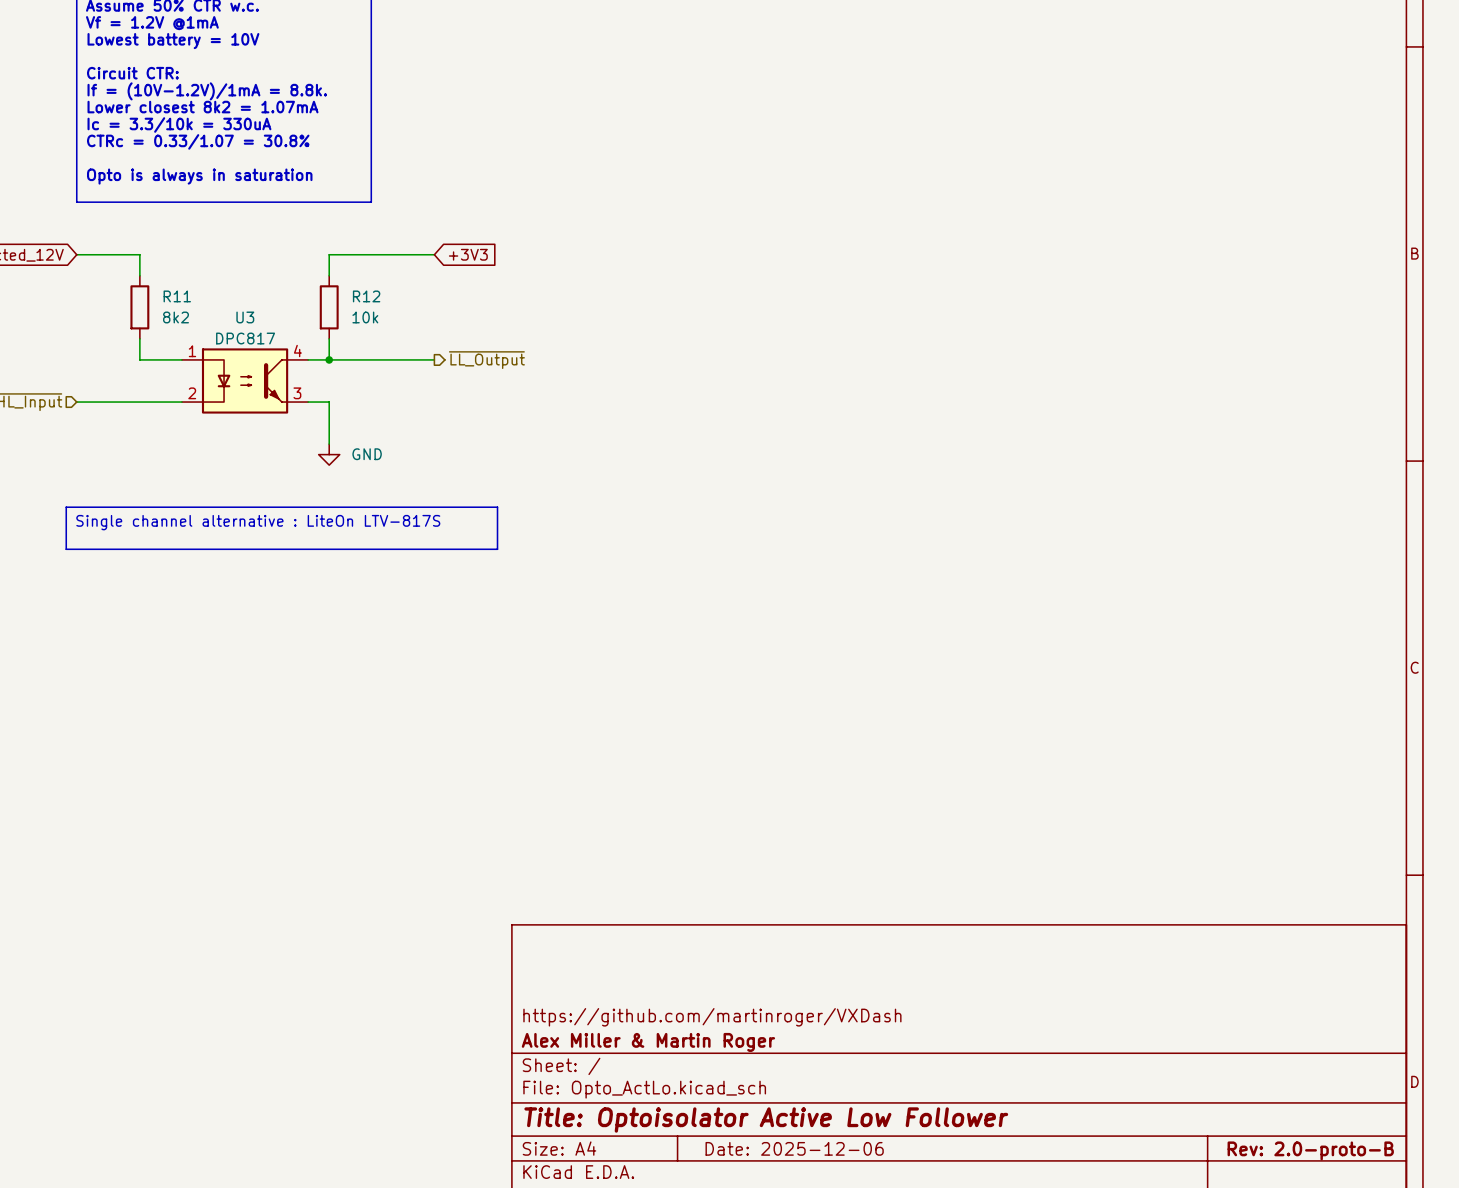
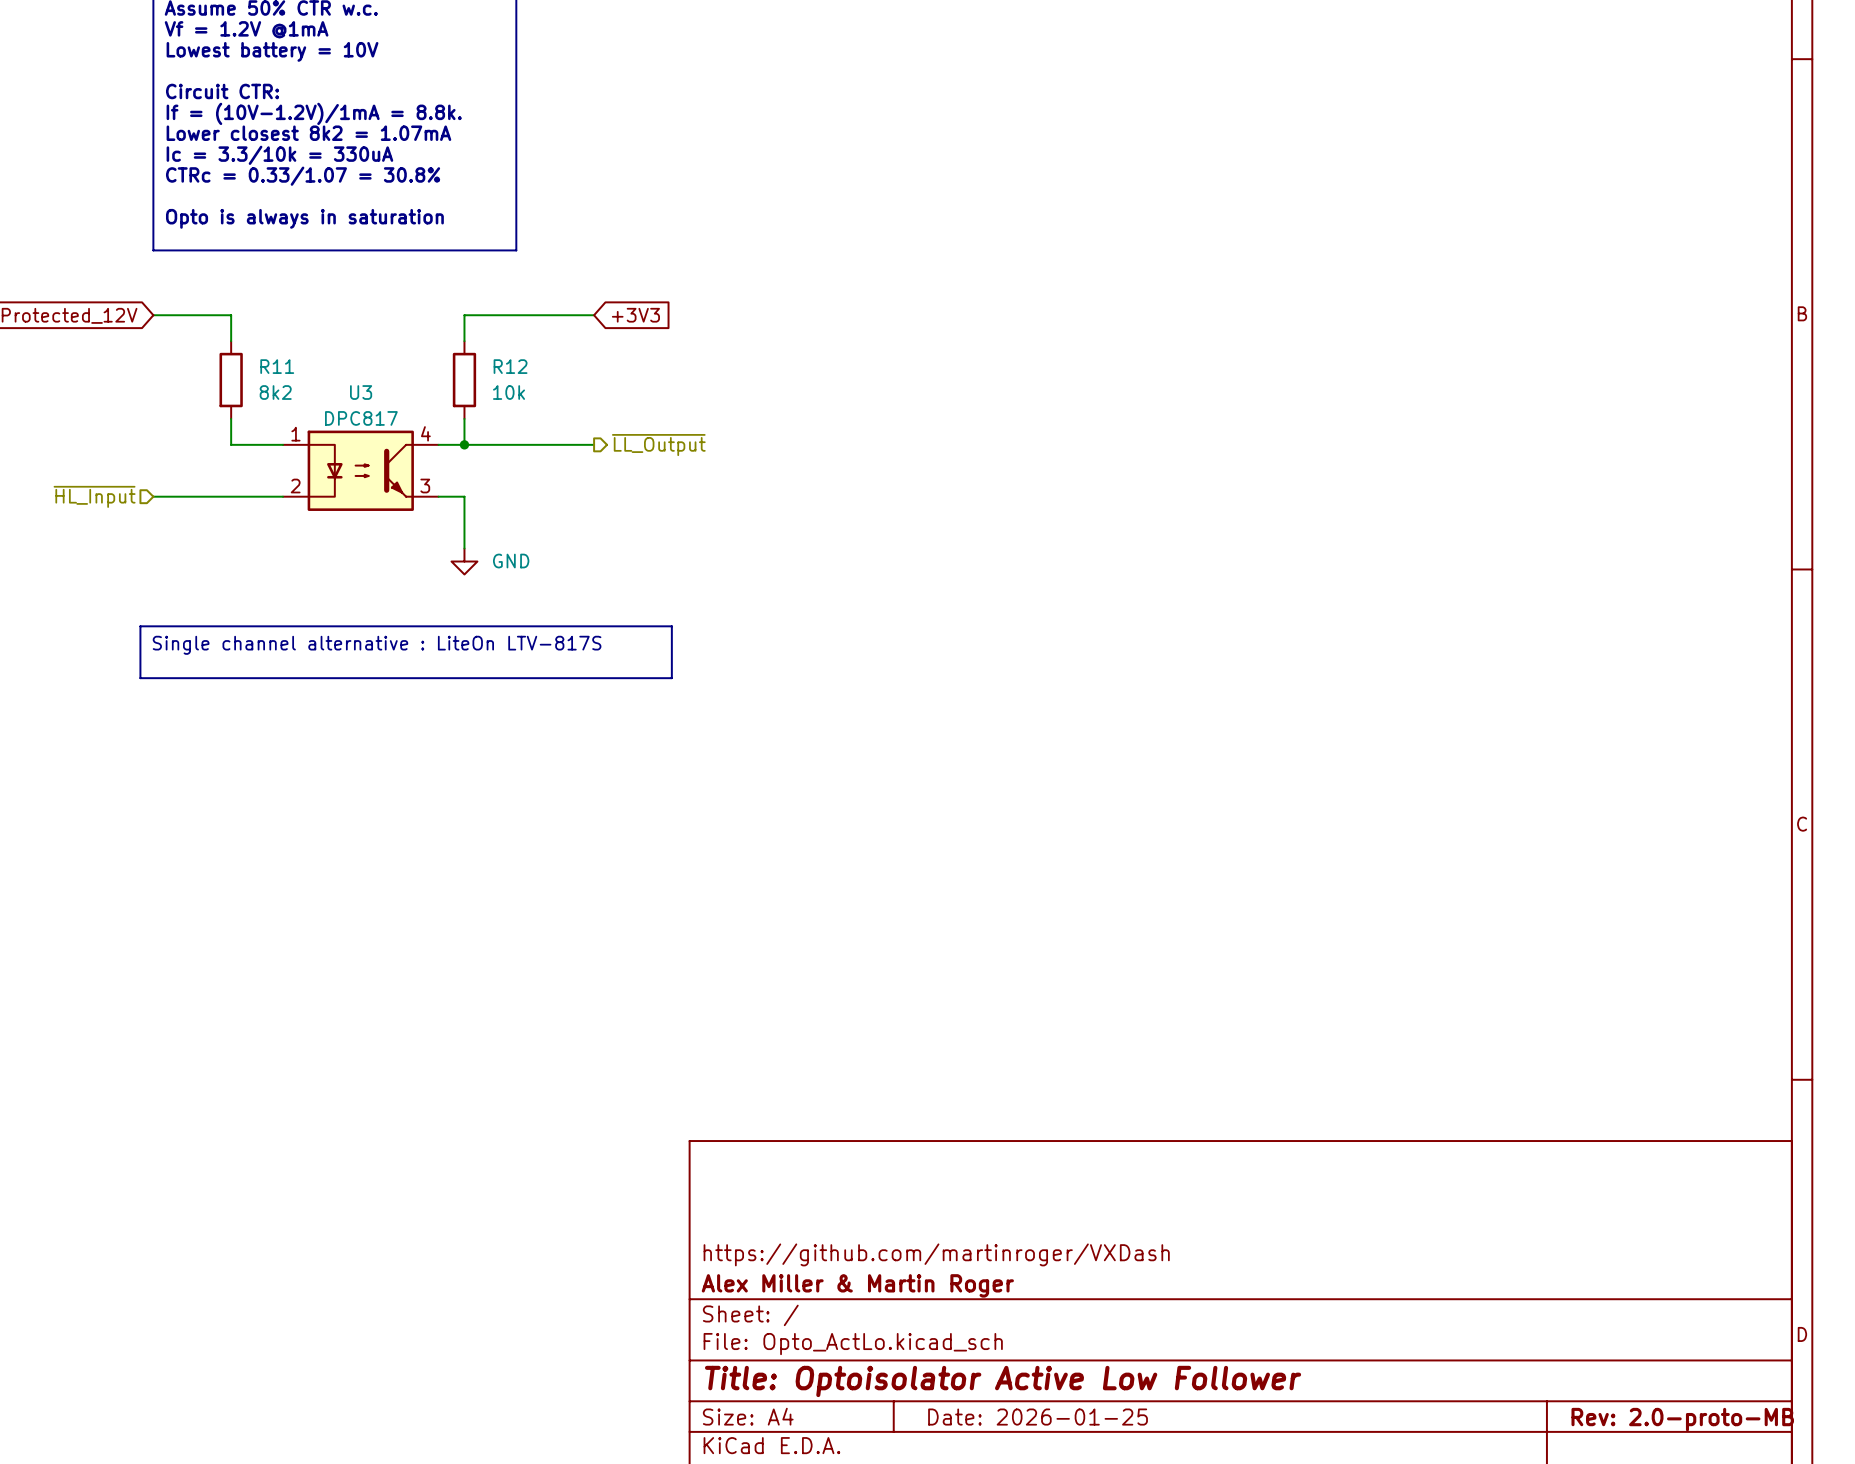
title block: Date: 2025-12-06 (794, 1148) -> Date: 2026-01-25 (1038, 1417)
title block: Rev: 2.0-proto-B (1310, 1150) -> Rev: 2.0-proto-MB (1682, 1419)

